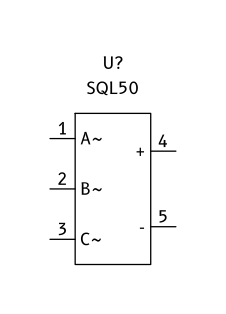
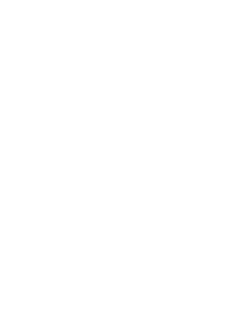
U?: SQL50 (112, 188) -> none

